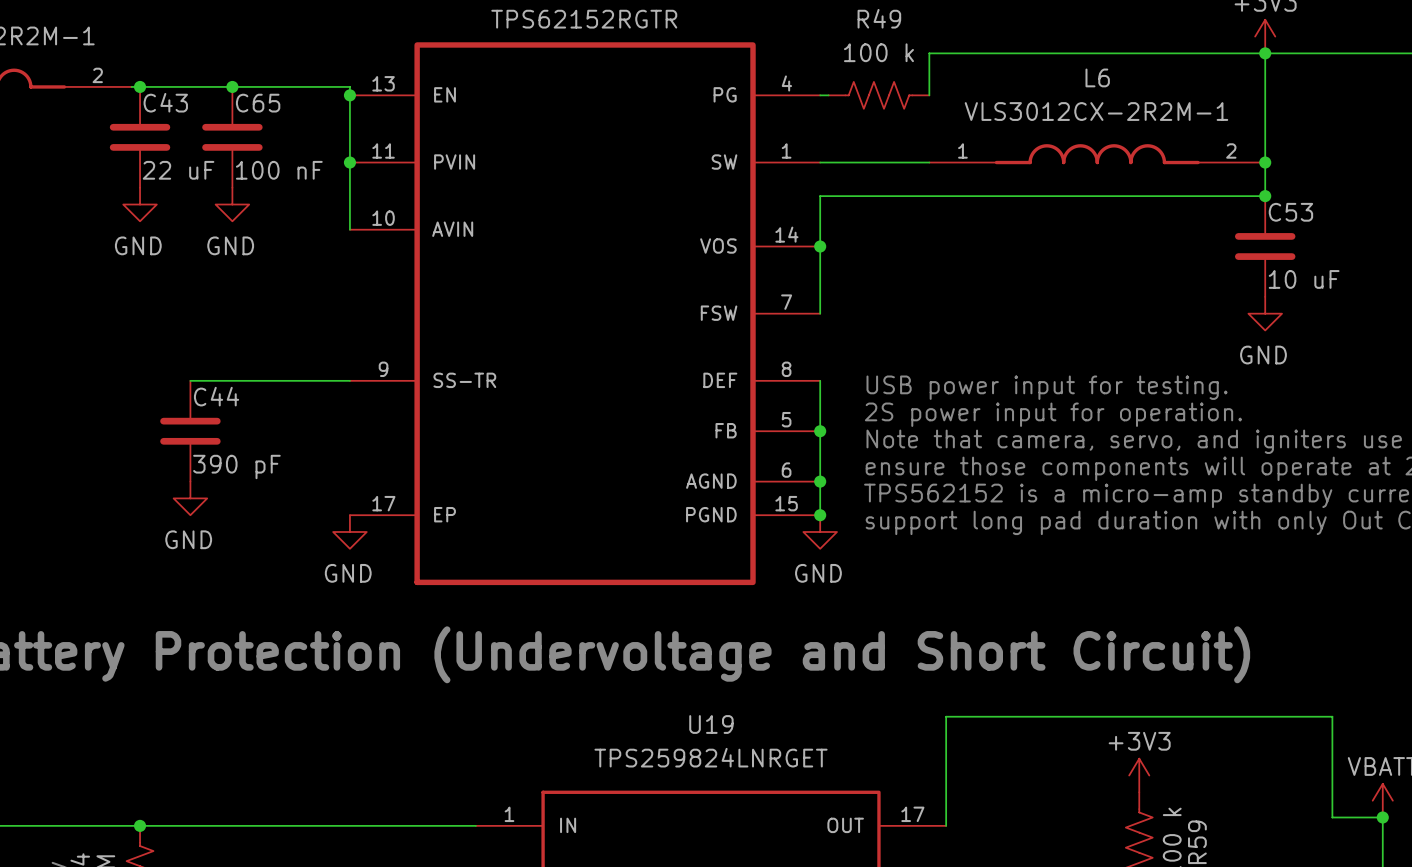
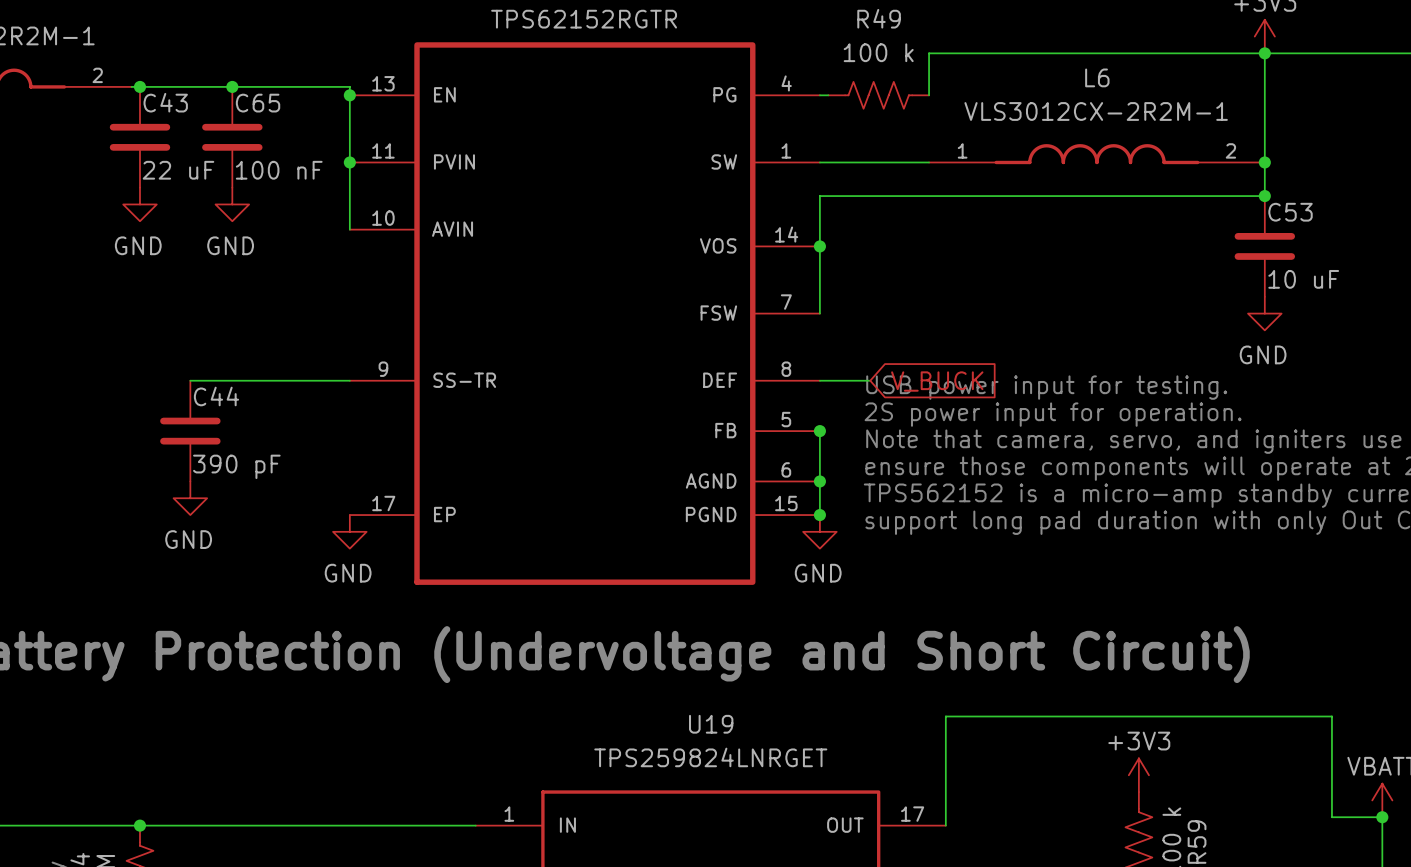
wire: (820, 380) (820, 431) -> (819, 380) (870, 380)
global label: none -> V_BUCK (937, 381)

